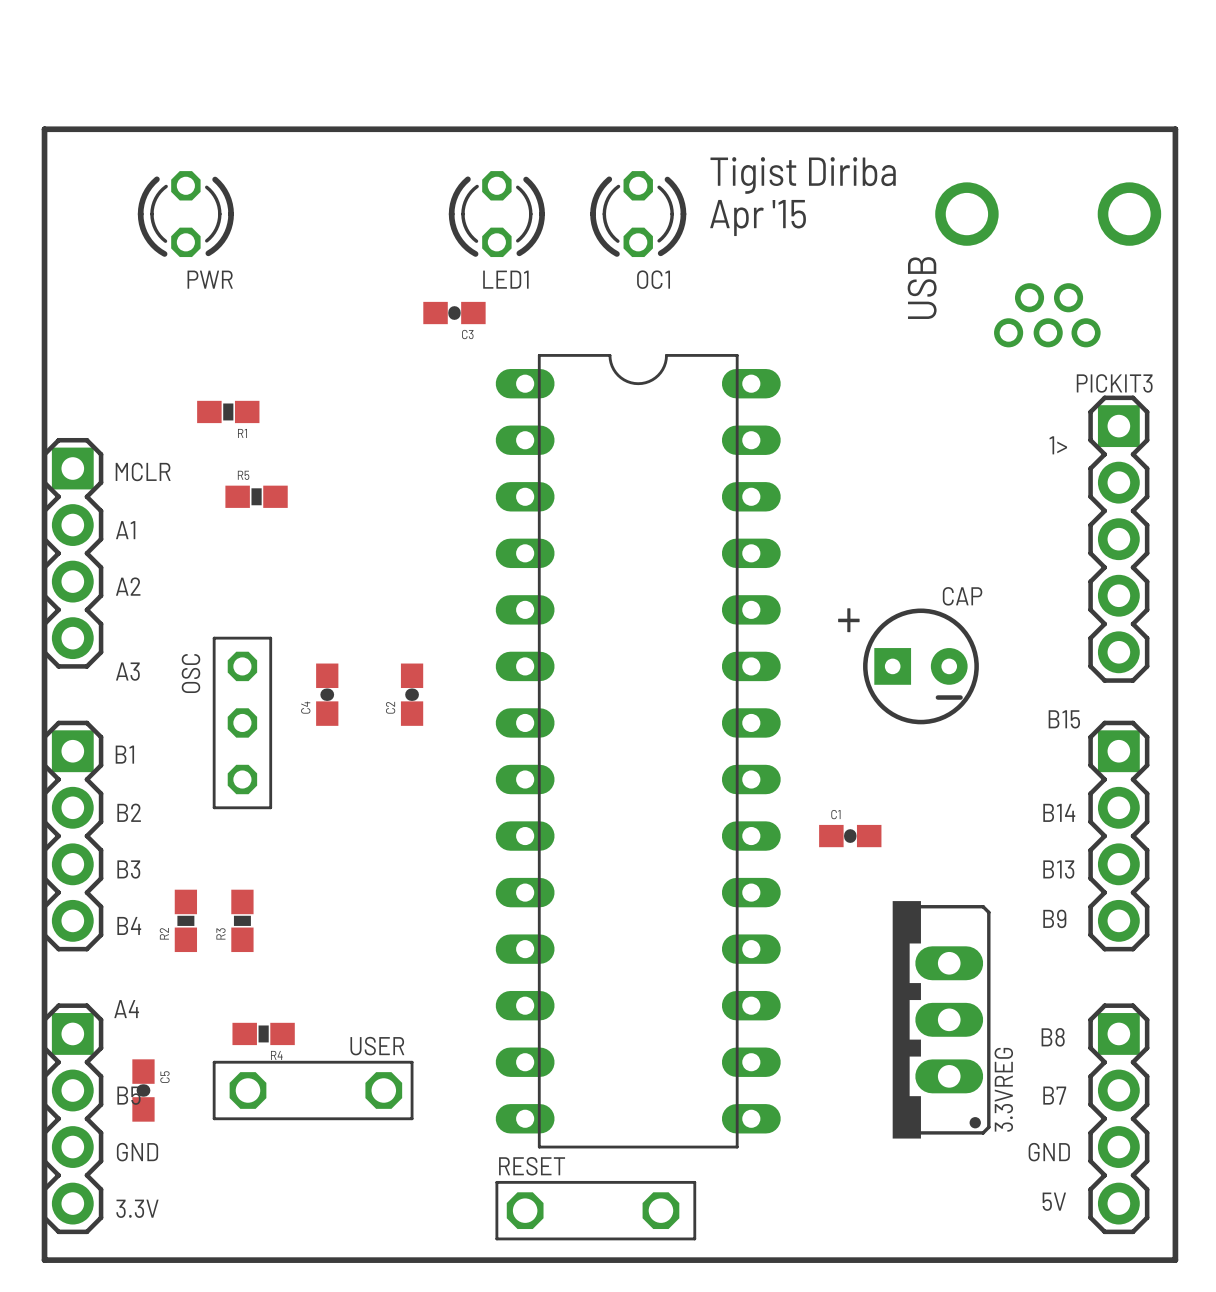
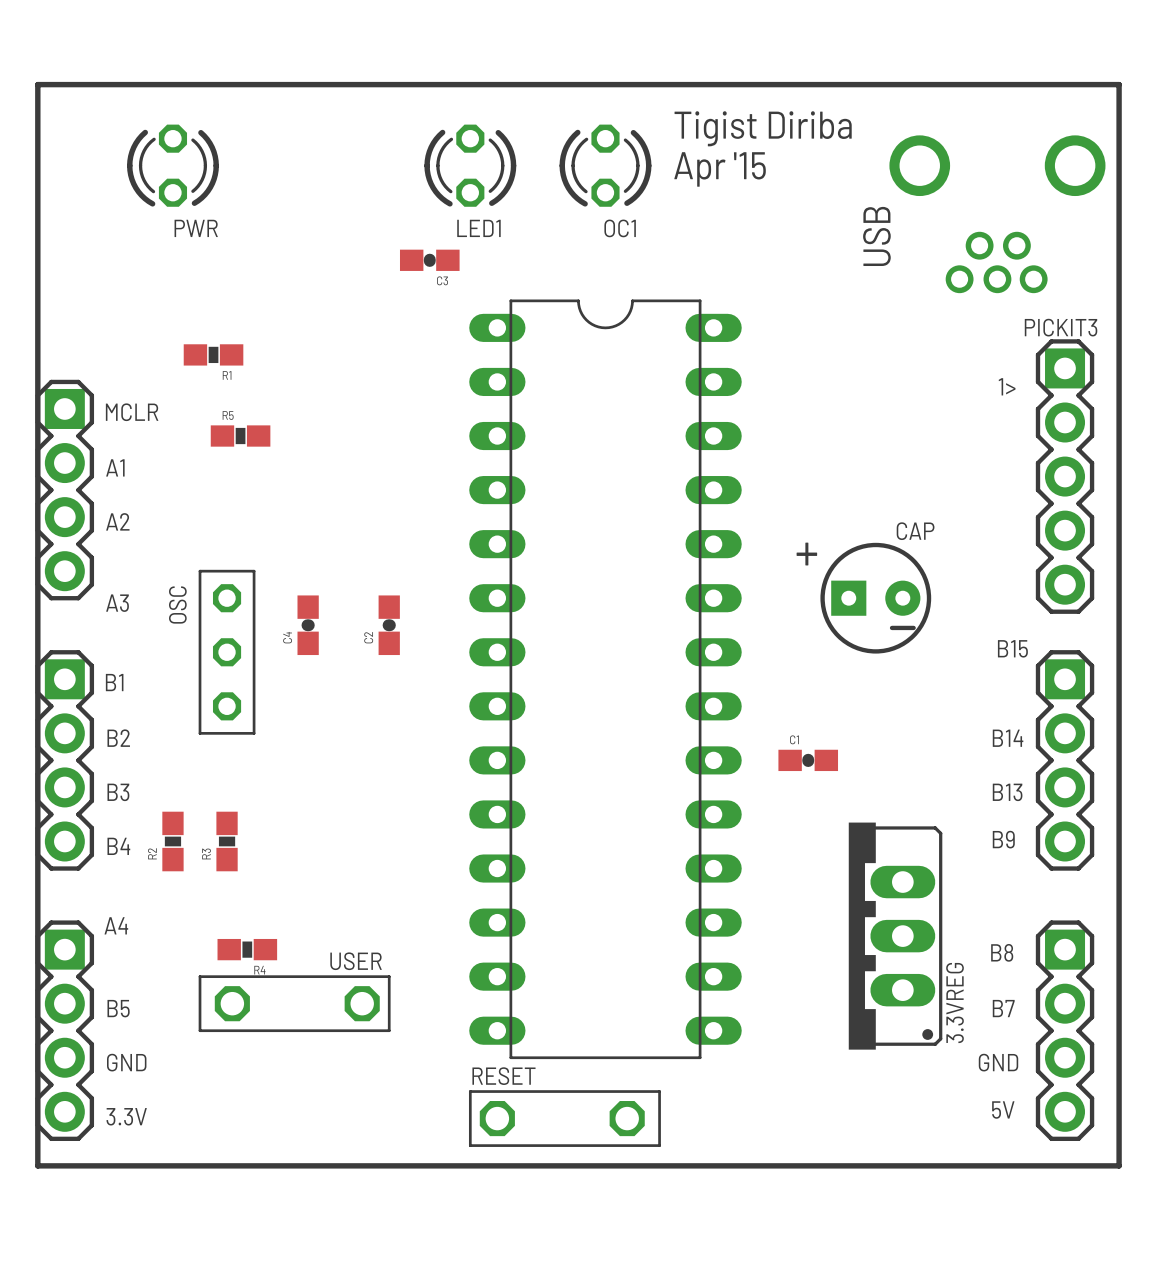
C5: (143, 1090) -> none

